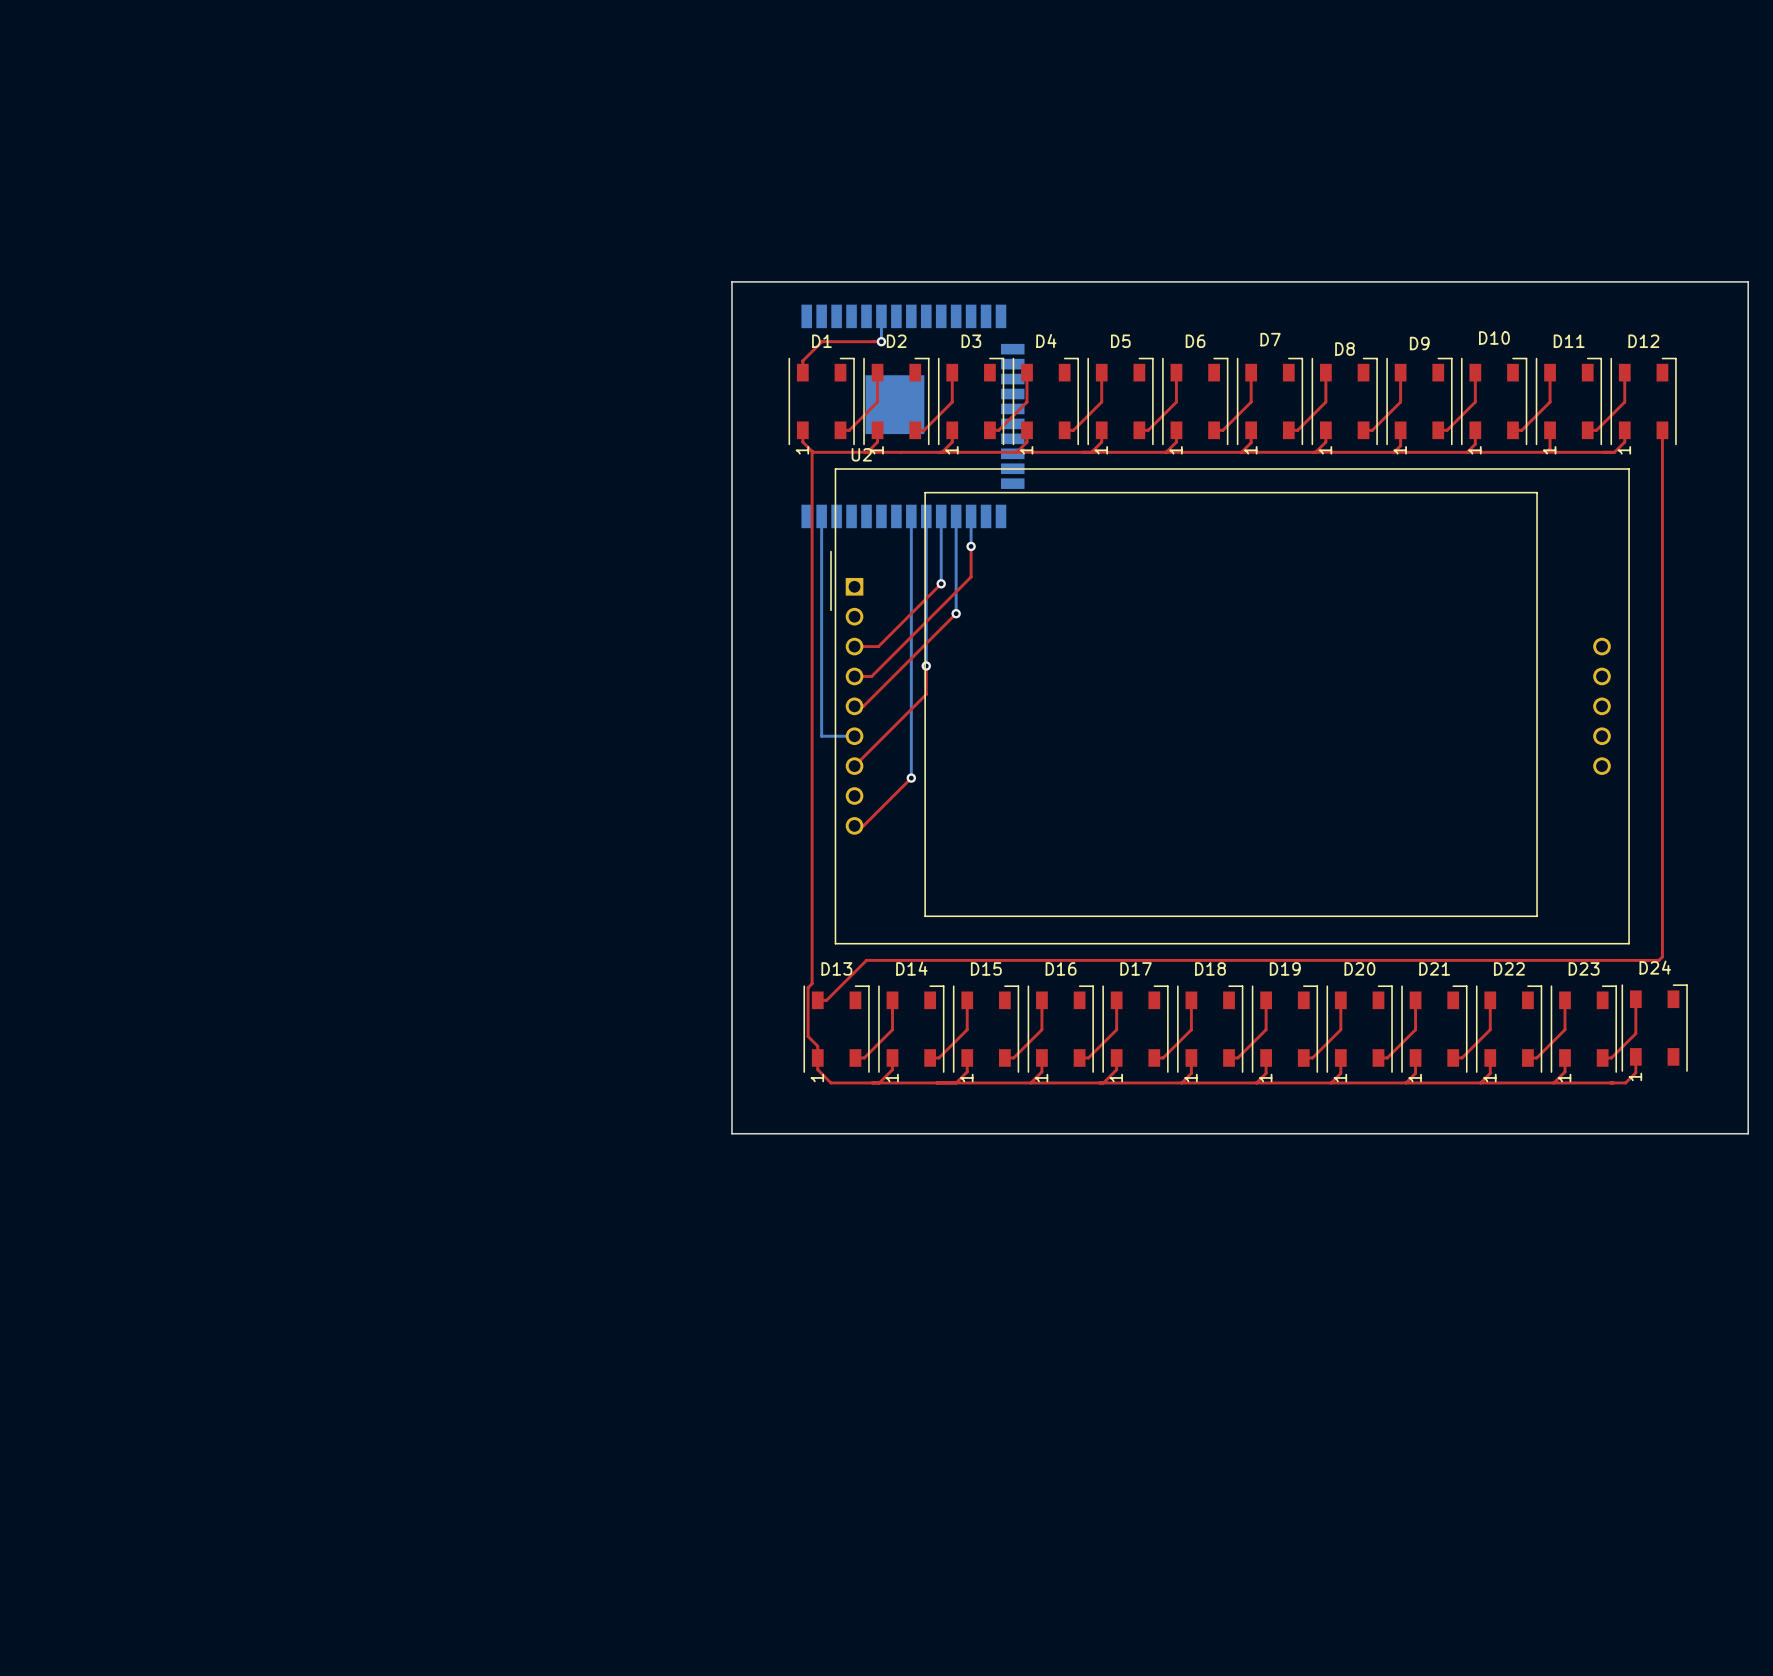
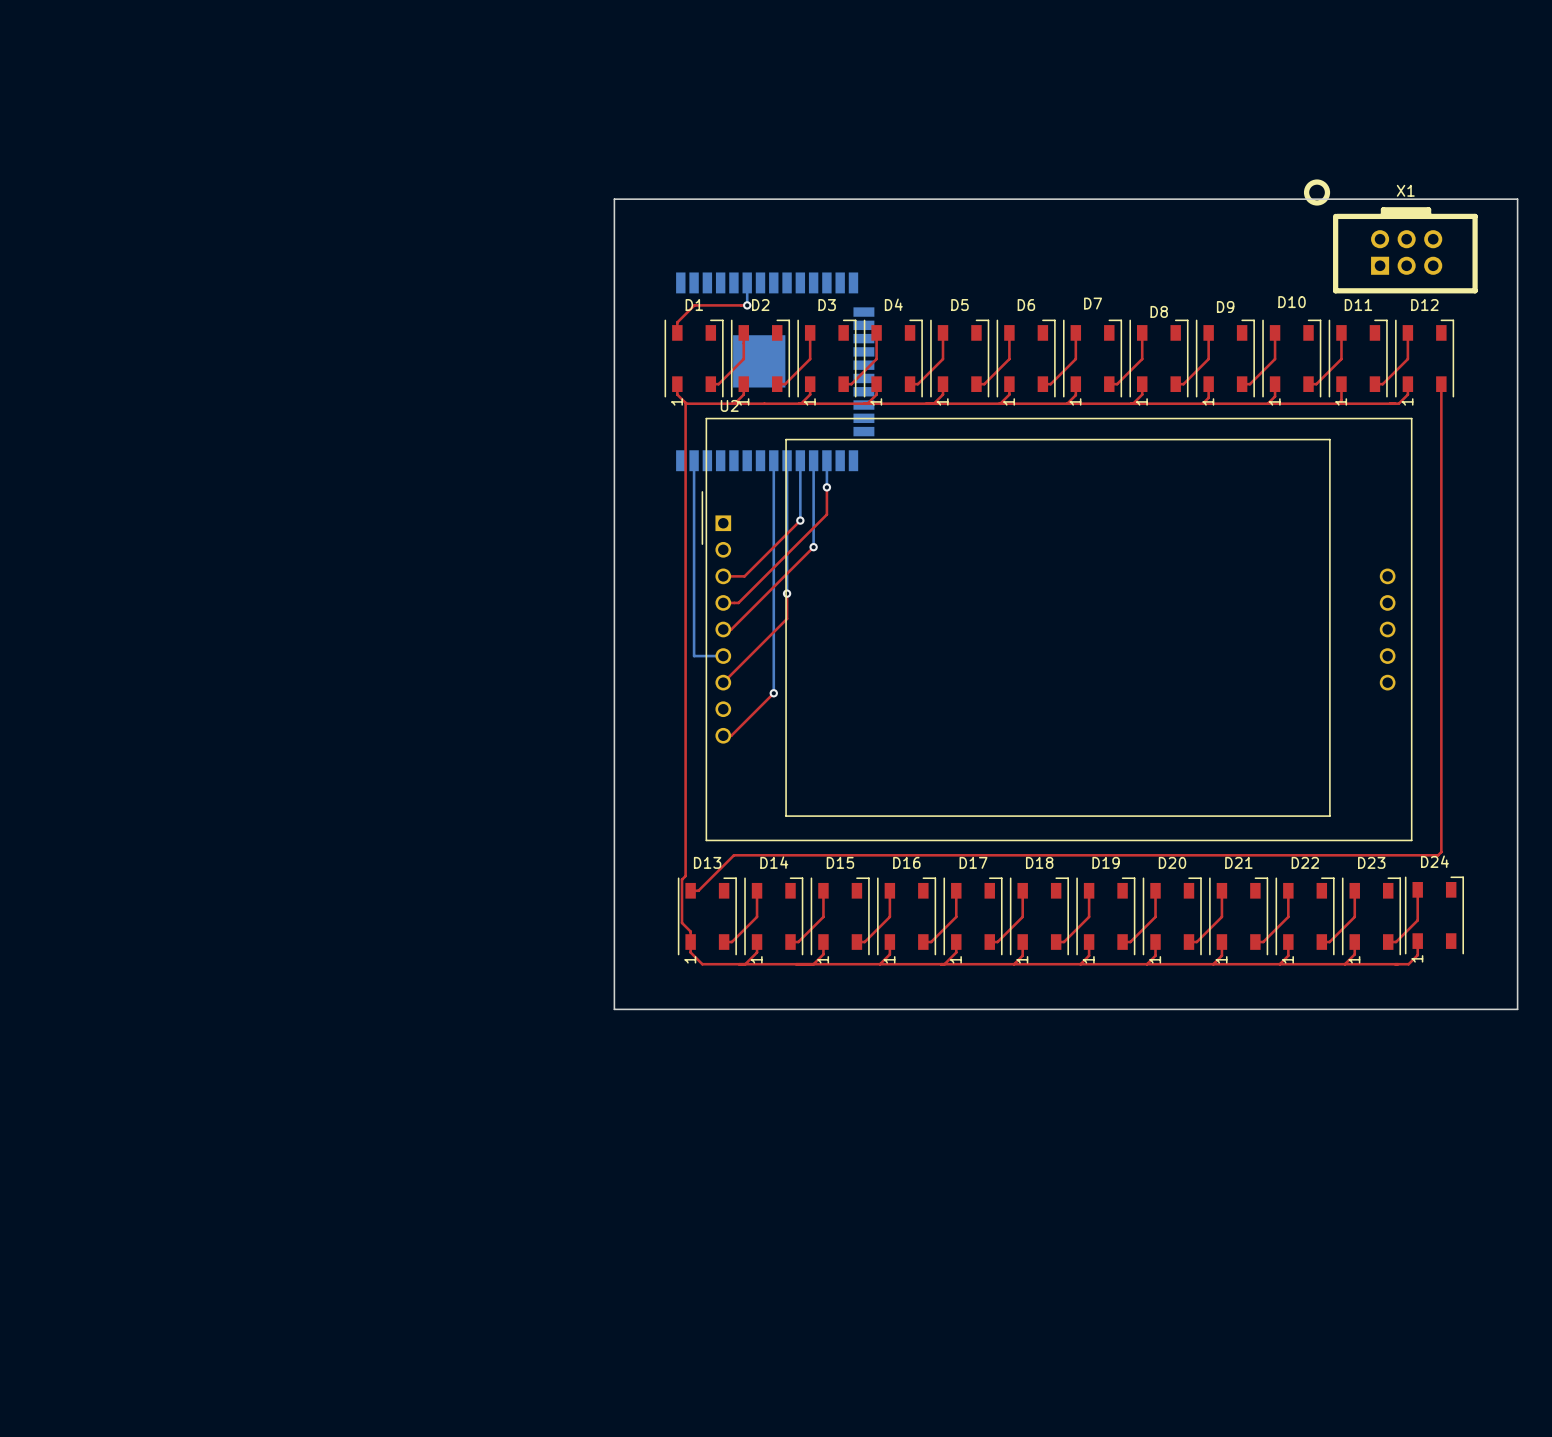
X1: none -> (1390, 236)
board edge: (731, 281) (1748, 281) -> (614, 252) (614, 199) (1517, 199) (1517, 252)

